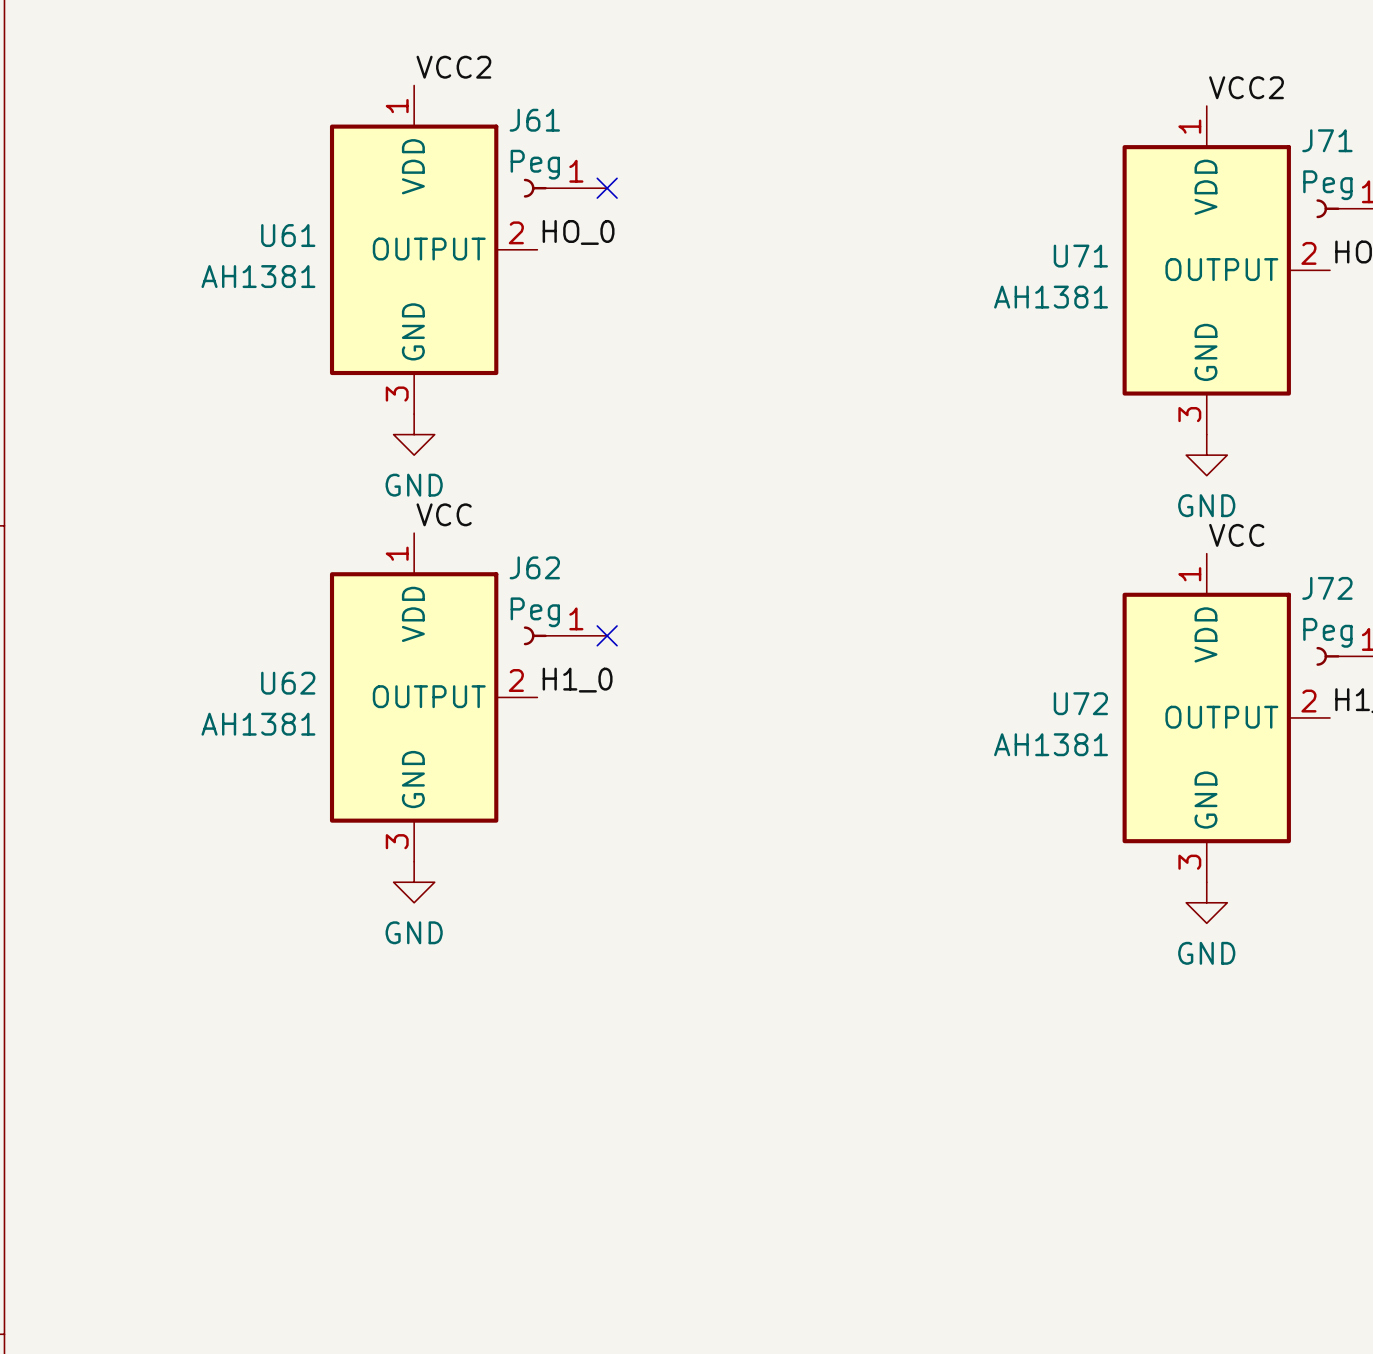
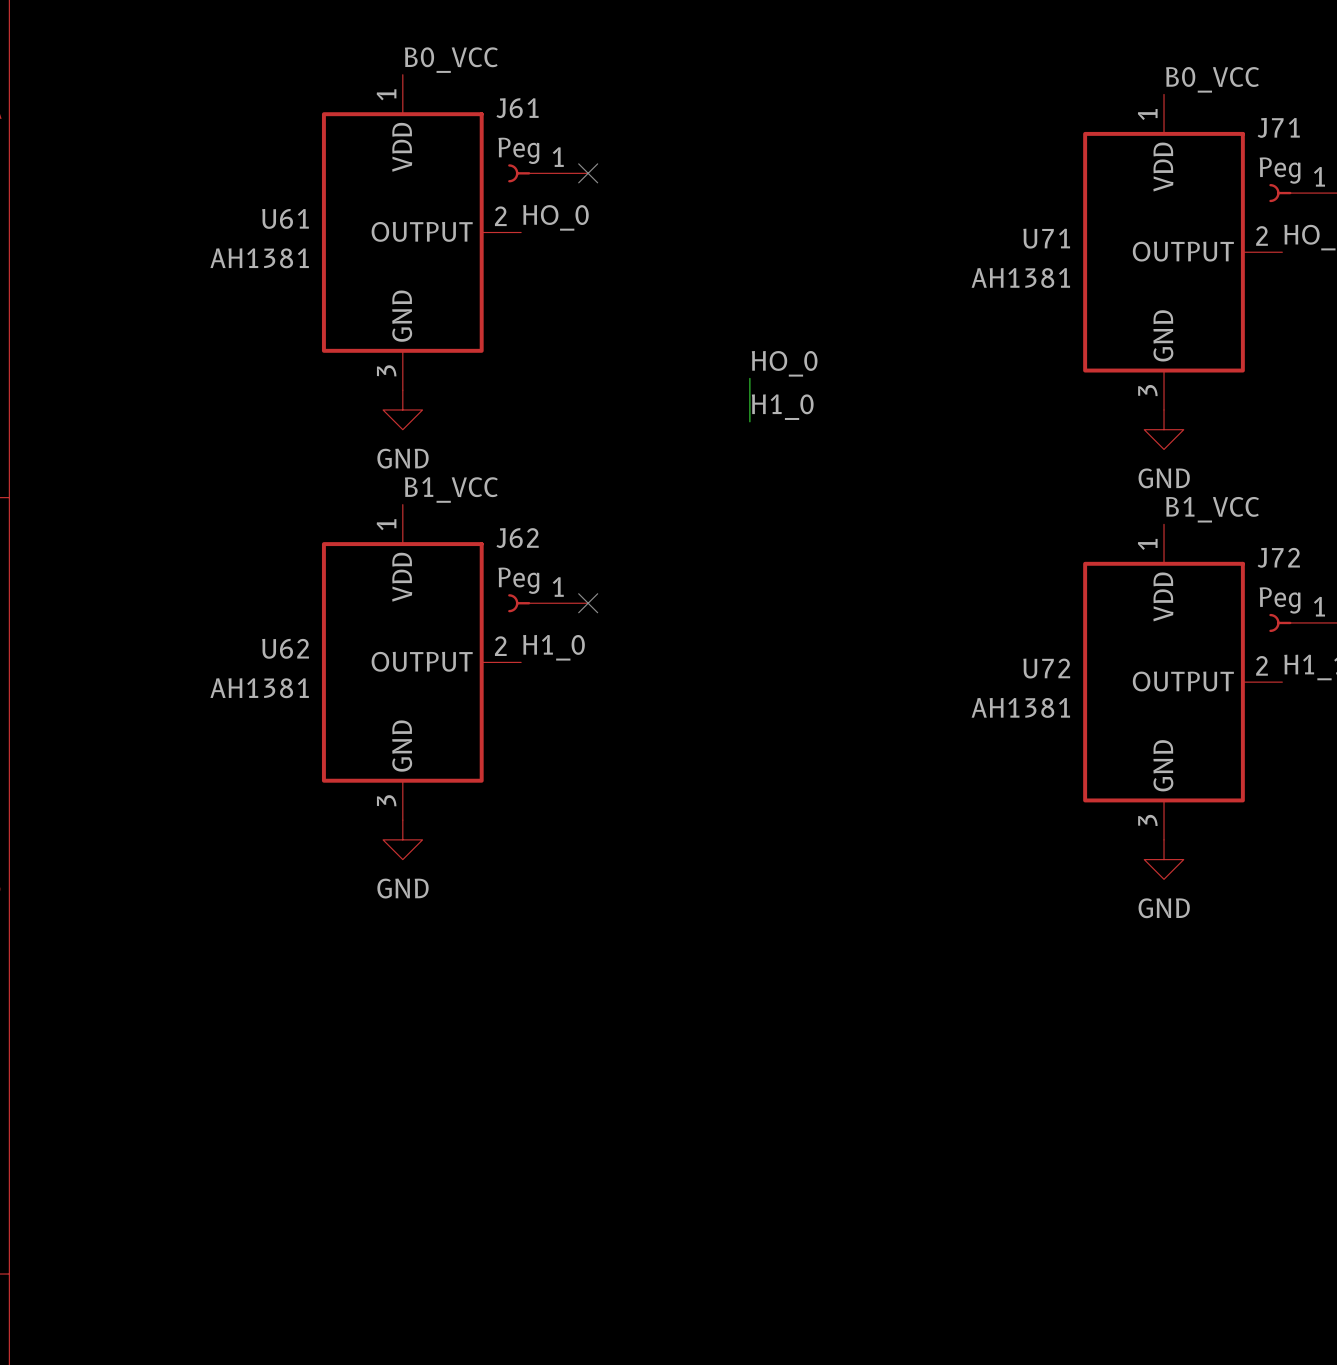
label: VCC2 (453, 67) -> B0_VCC (451, 60)
label: VCC2 (1246, 87) -> B0_VCC (1212, 79)
label: none -> HO_0 (784, 363)
wire: none -> (749, 378) (749, 421)
label: none -> H1_0 (782, 407)
label: VCC (444, 514) -> B1_VCC (451, 490)
label: VCC (1236, 535) -> B1_VCC (1212, 509)

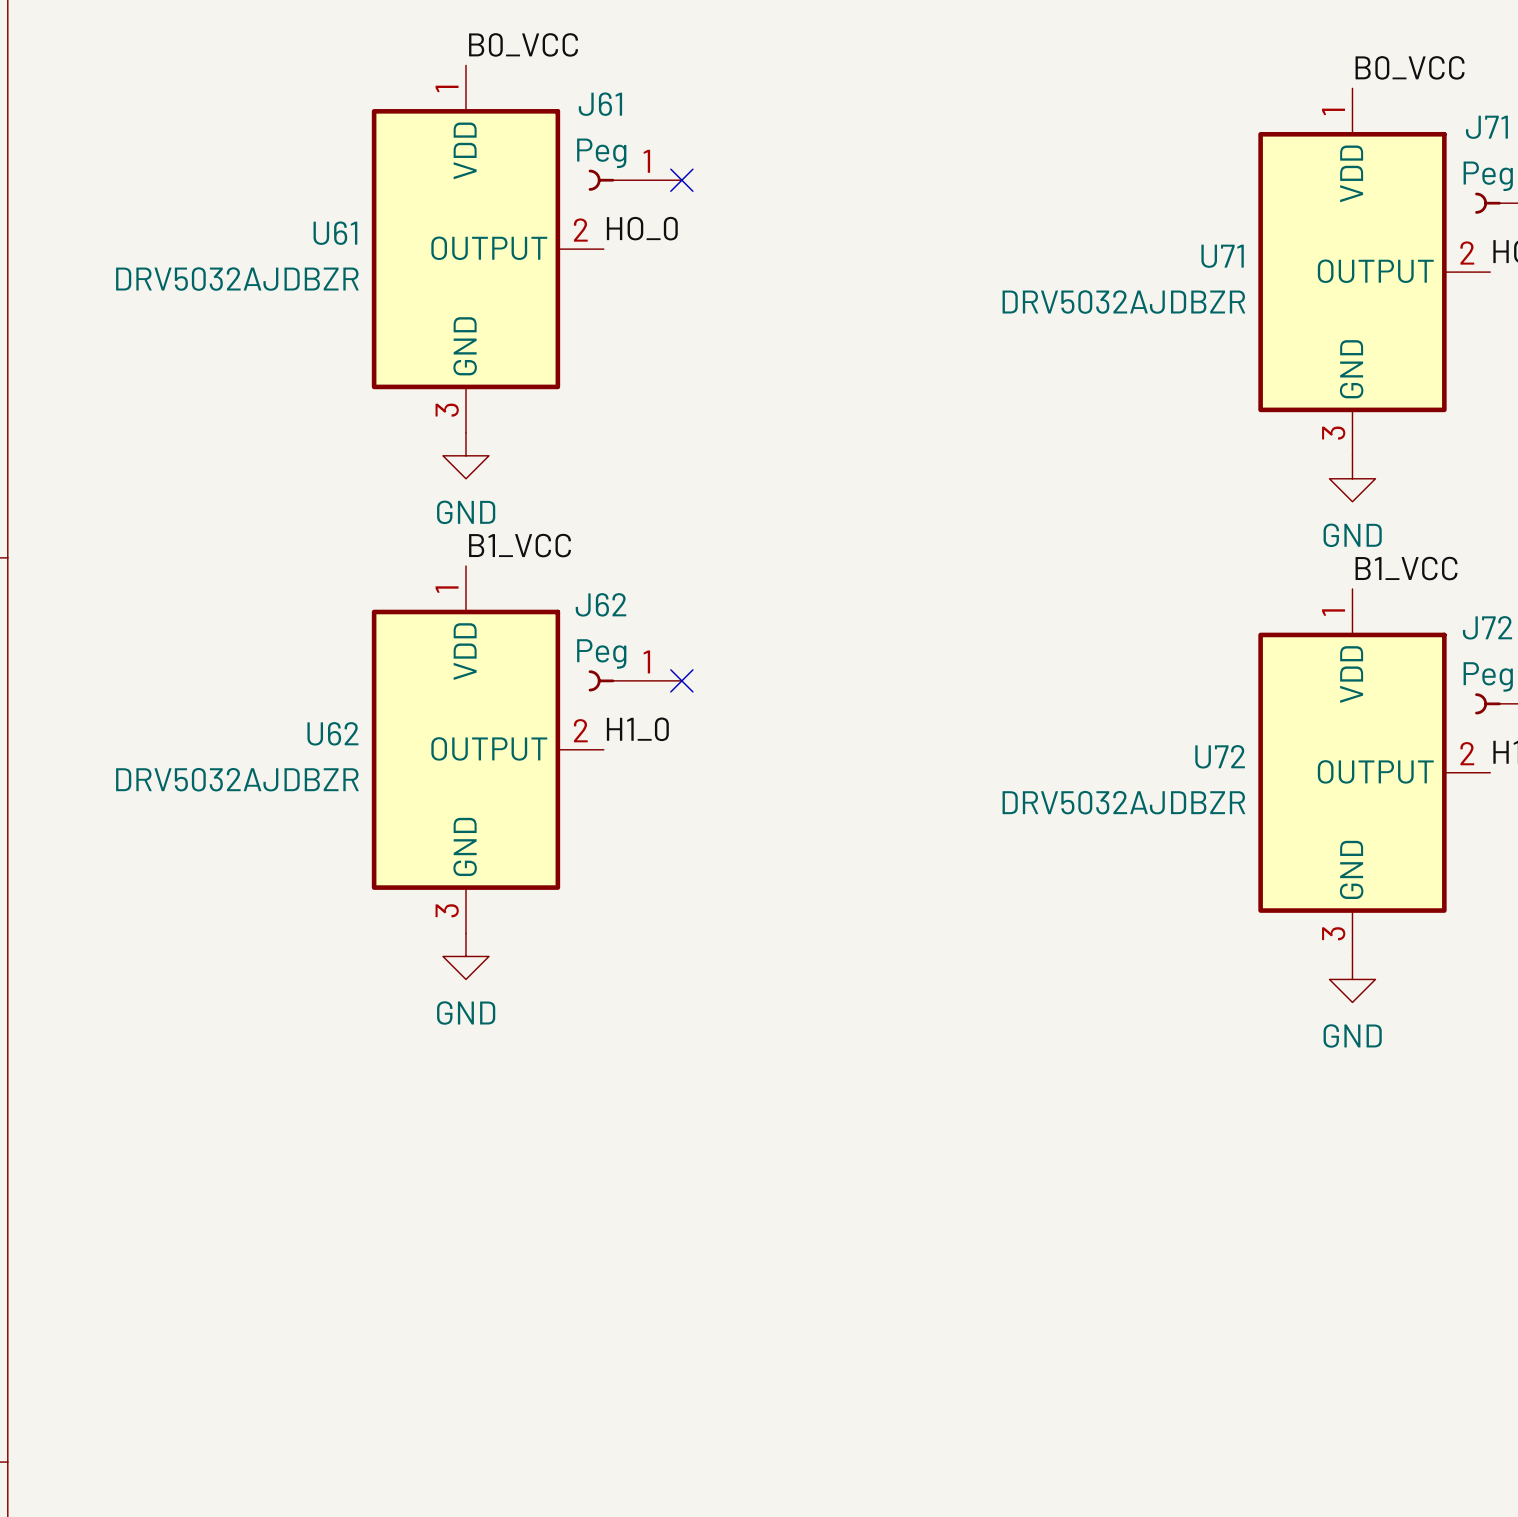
U61 value: AH1381 (259, 258) -> DRV5032AJDBZR (237, 279)
U71 value: AH1381 (1020, 278) -> DRV5032AJDBZR (1123, 302)
label: HO_0 (784, 363) -> none
wire: (749, 378) (749, 421) -> none
label: H1_0 (782, 407) -> none
U62 value: AH1381 (259, 688) -> DRV5032AJDBZR (237, 779)
U72 value: AH1381 (1020, 707) -> DRV5032AJDBZR (1123, 802)

